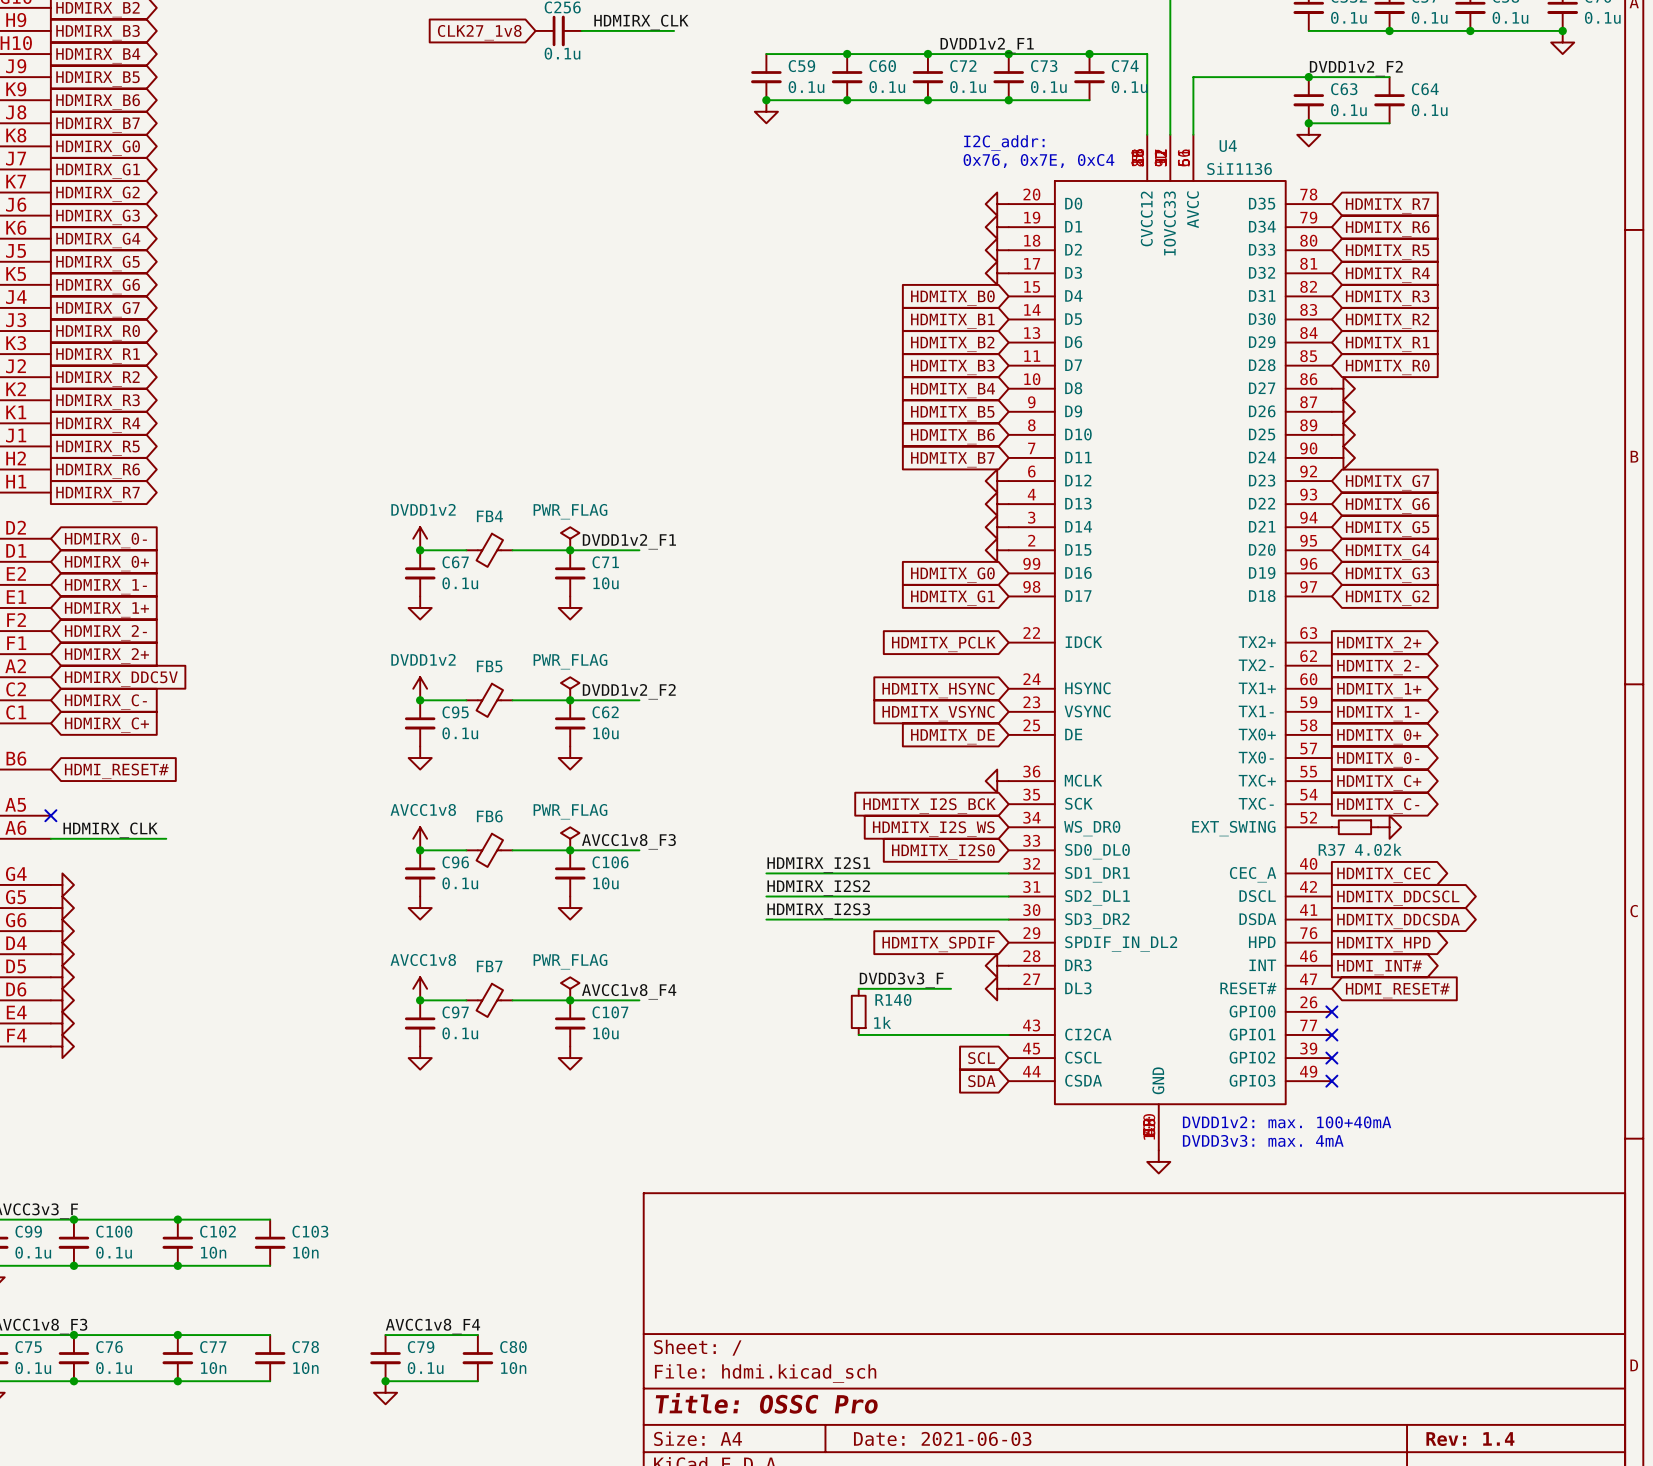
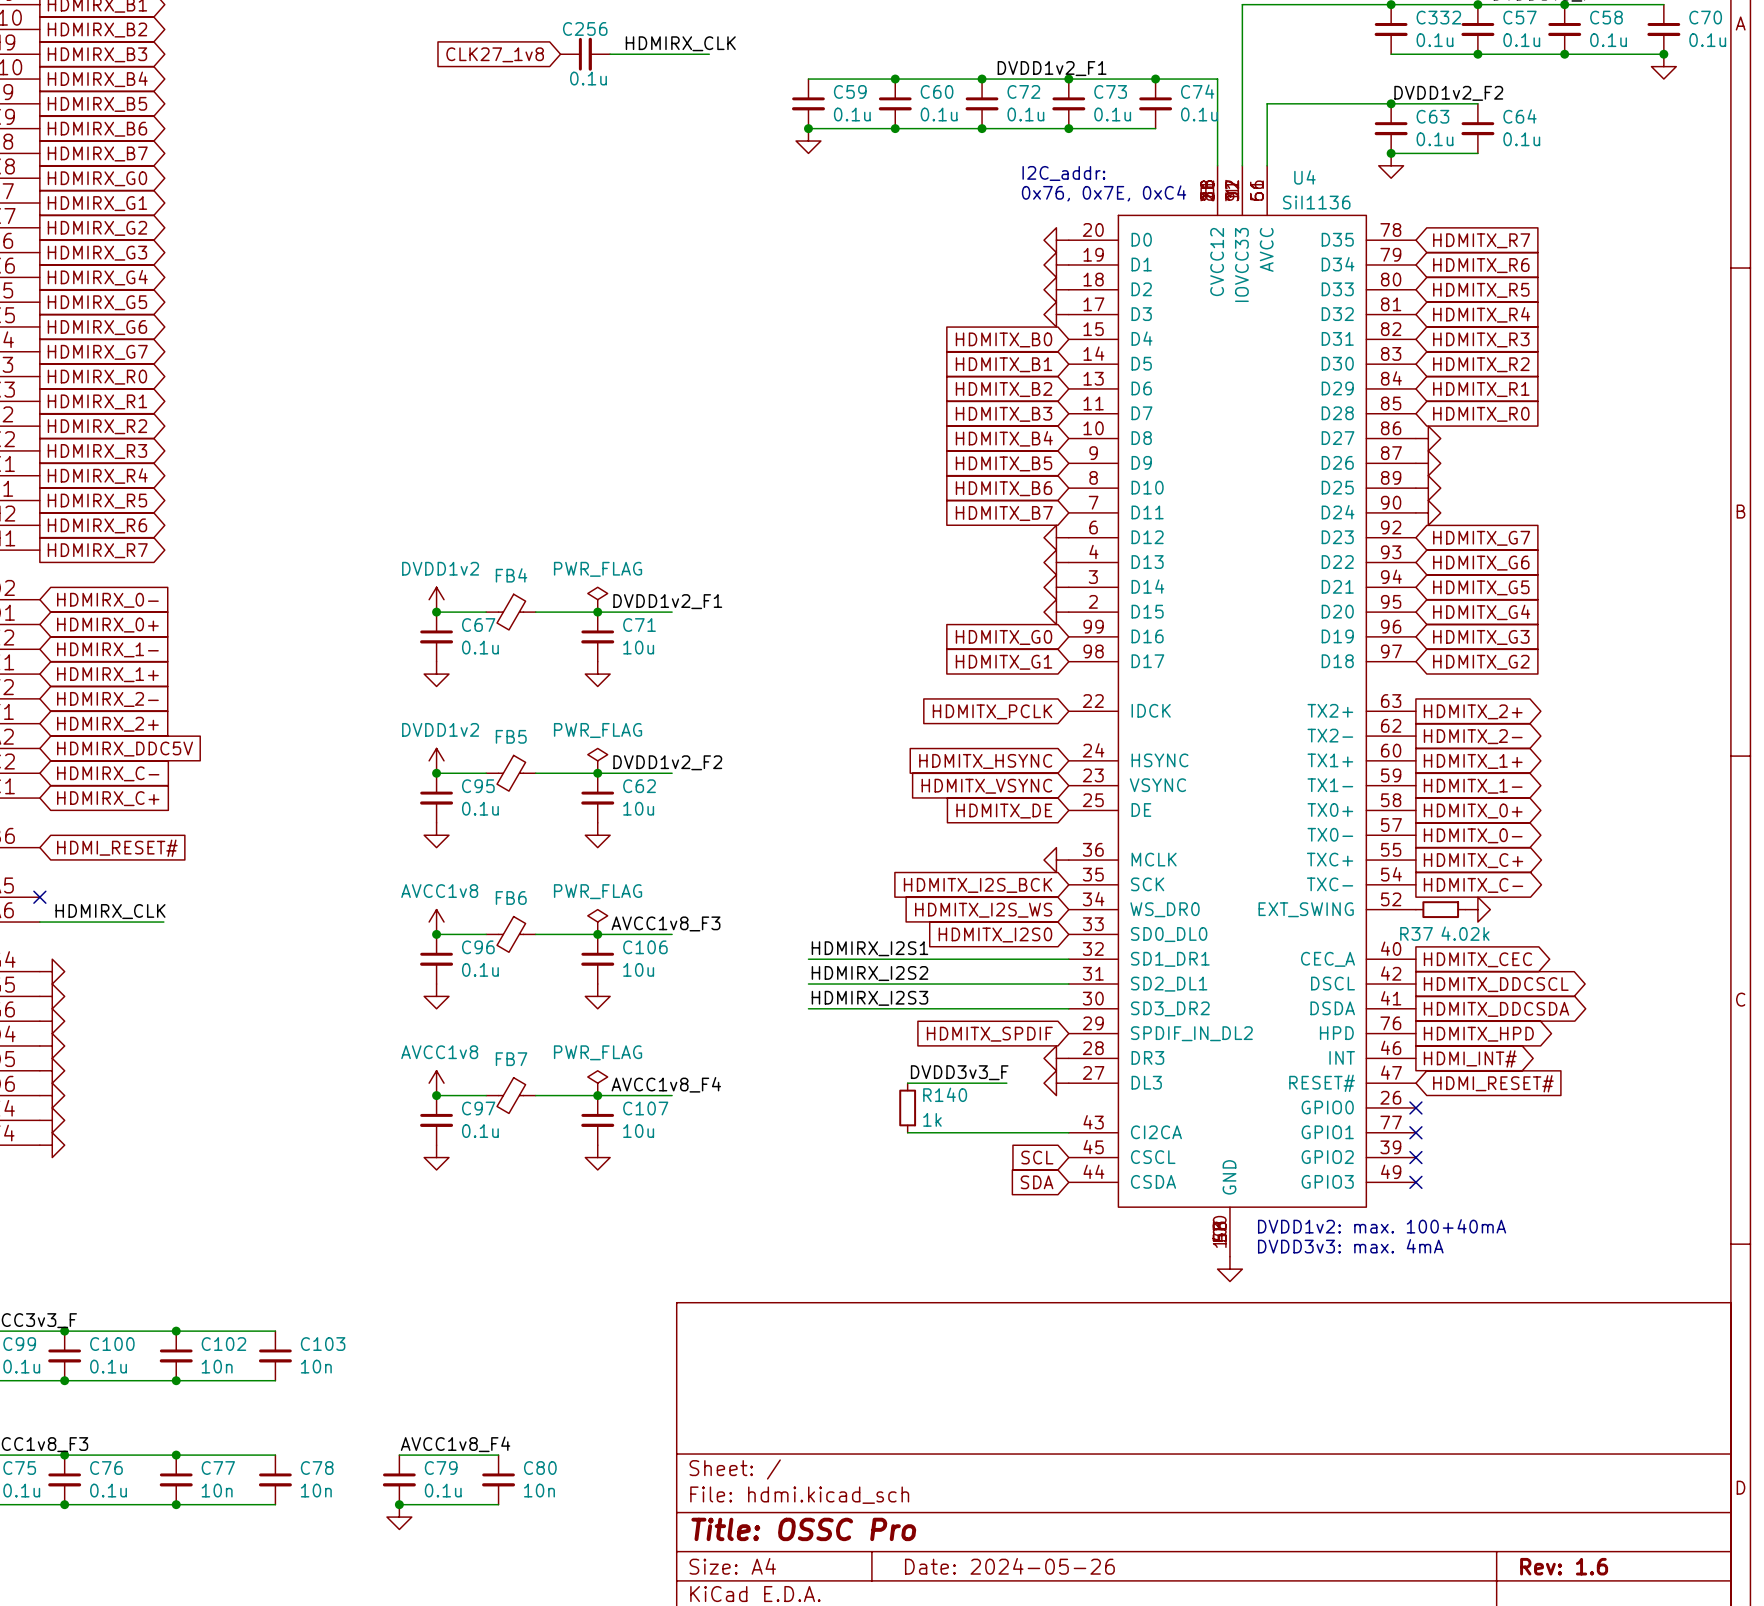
title block: Date: 2021-06-03 (942, 1438) -> Date: 2024-05-26 (1009, 1566)
title block: Rev: 1.4 (1470, 1439) -> Rev: 1.6 (1564, 1566)

